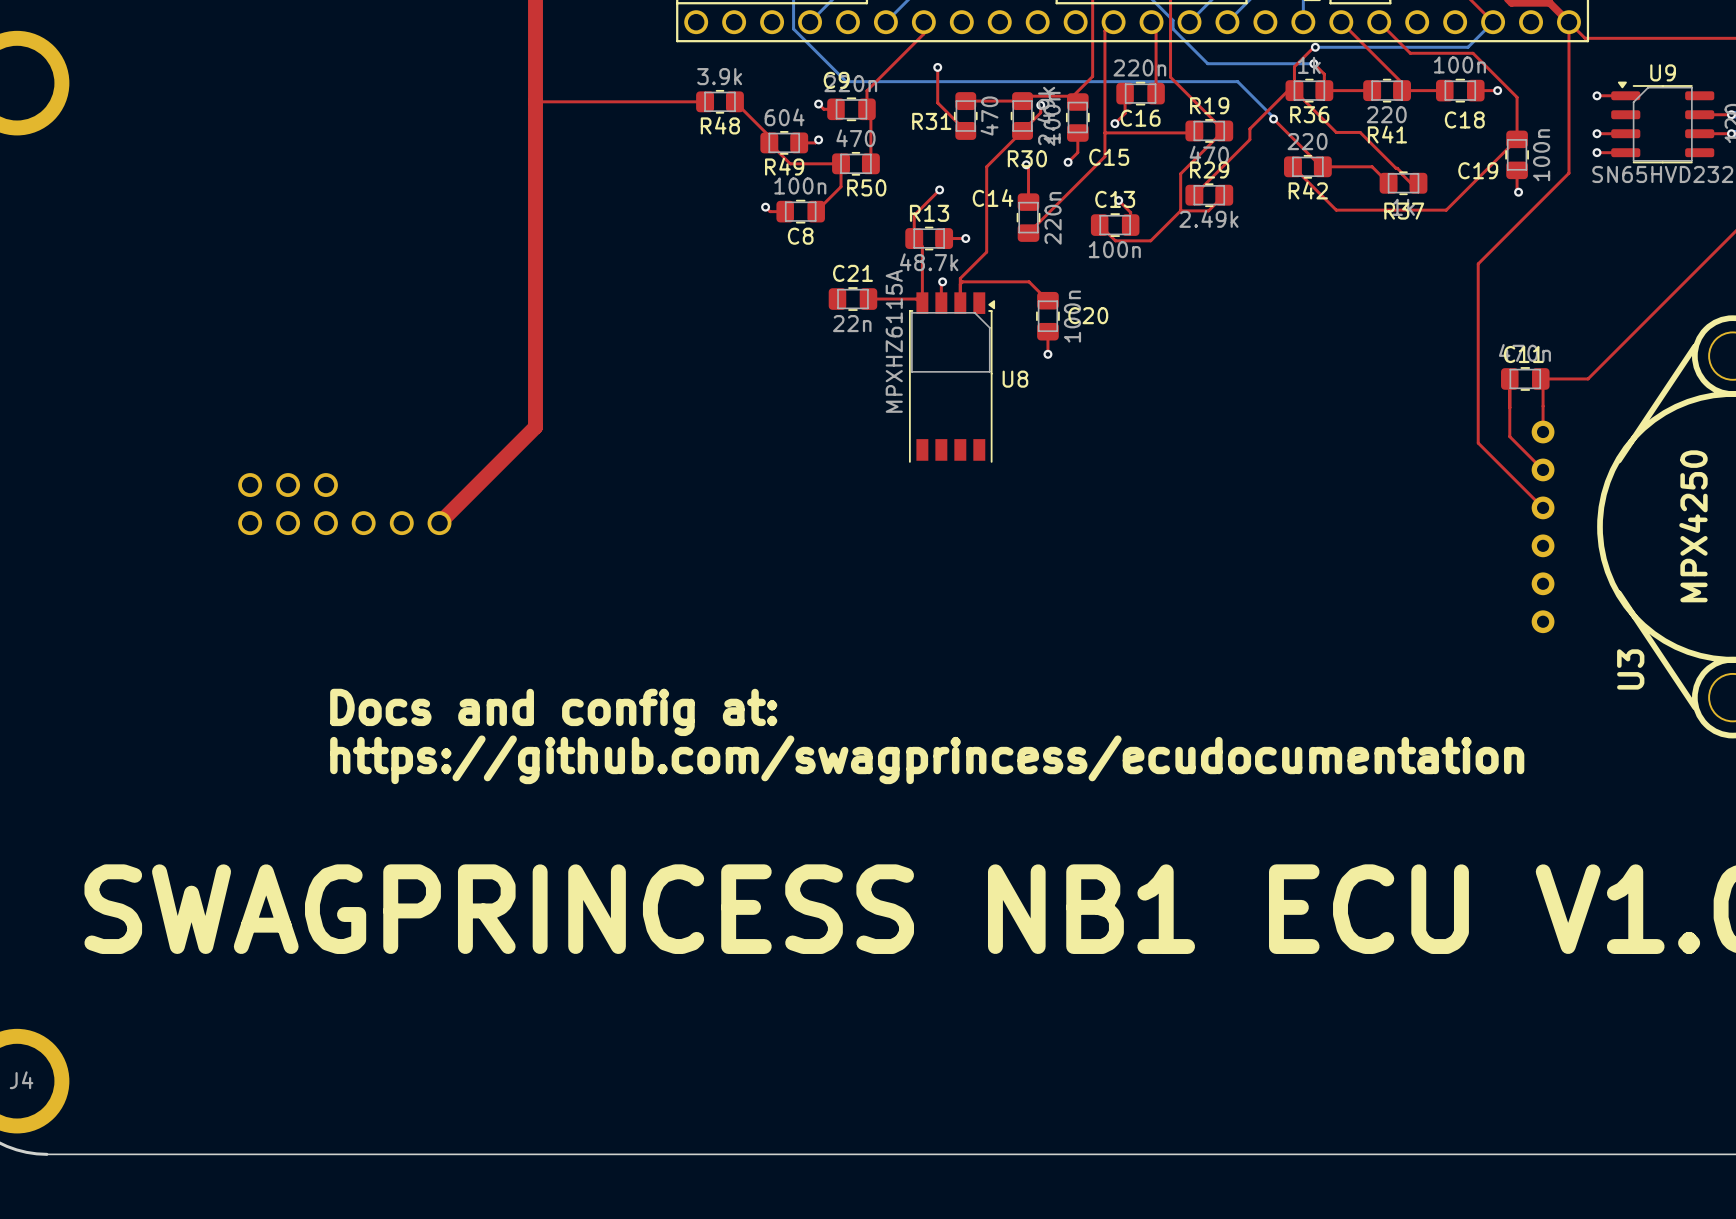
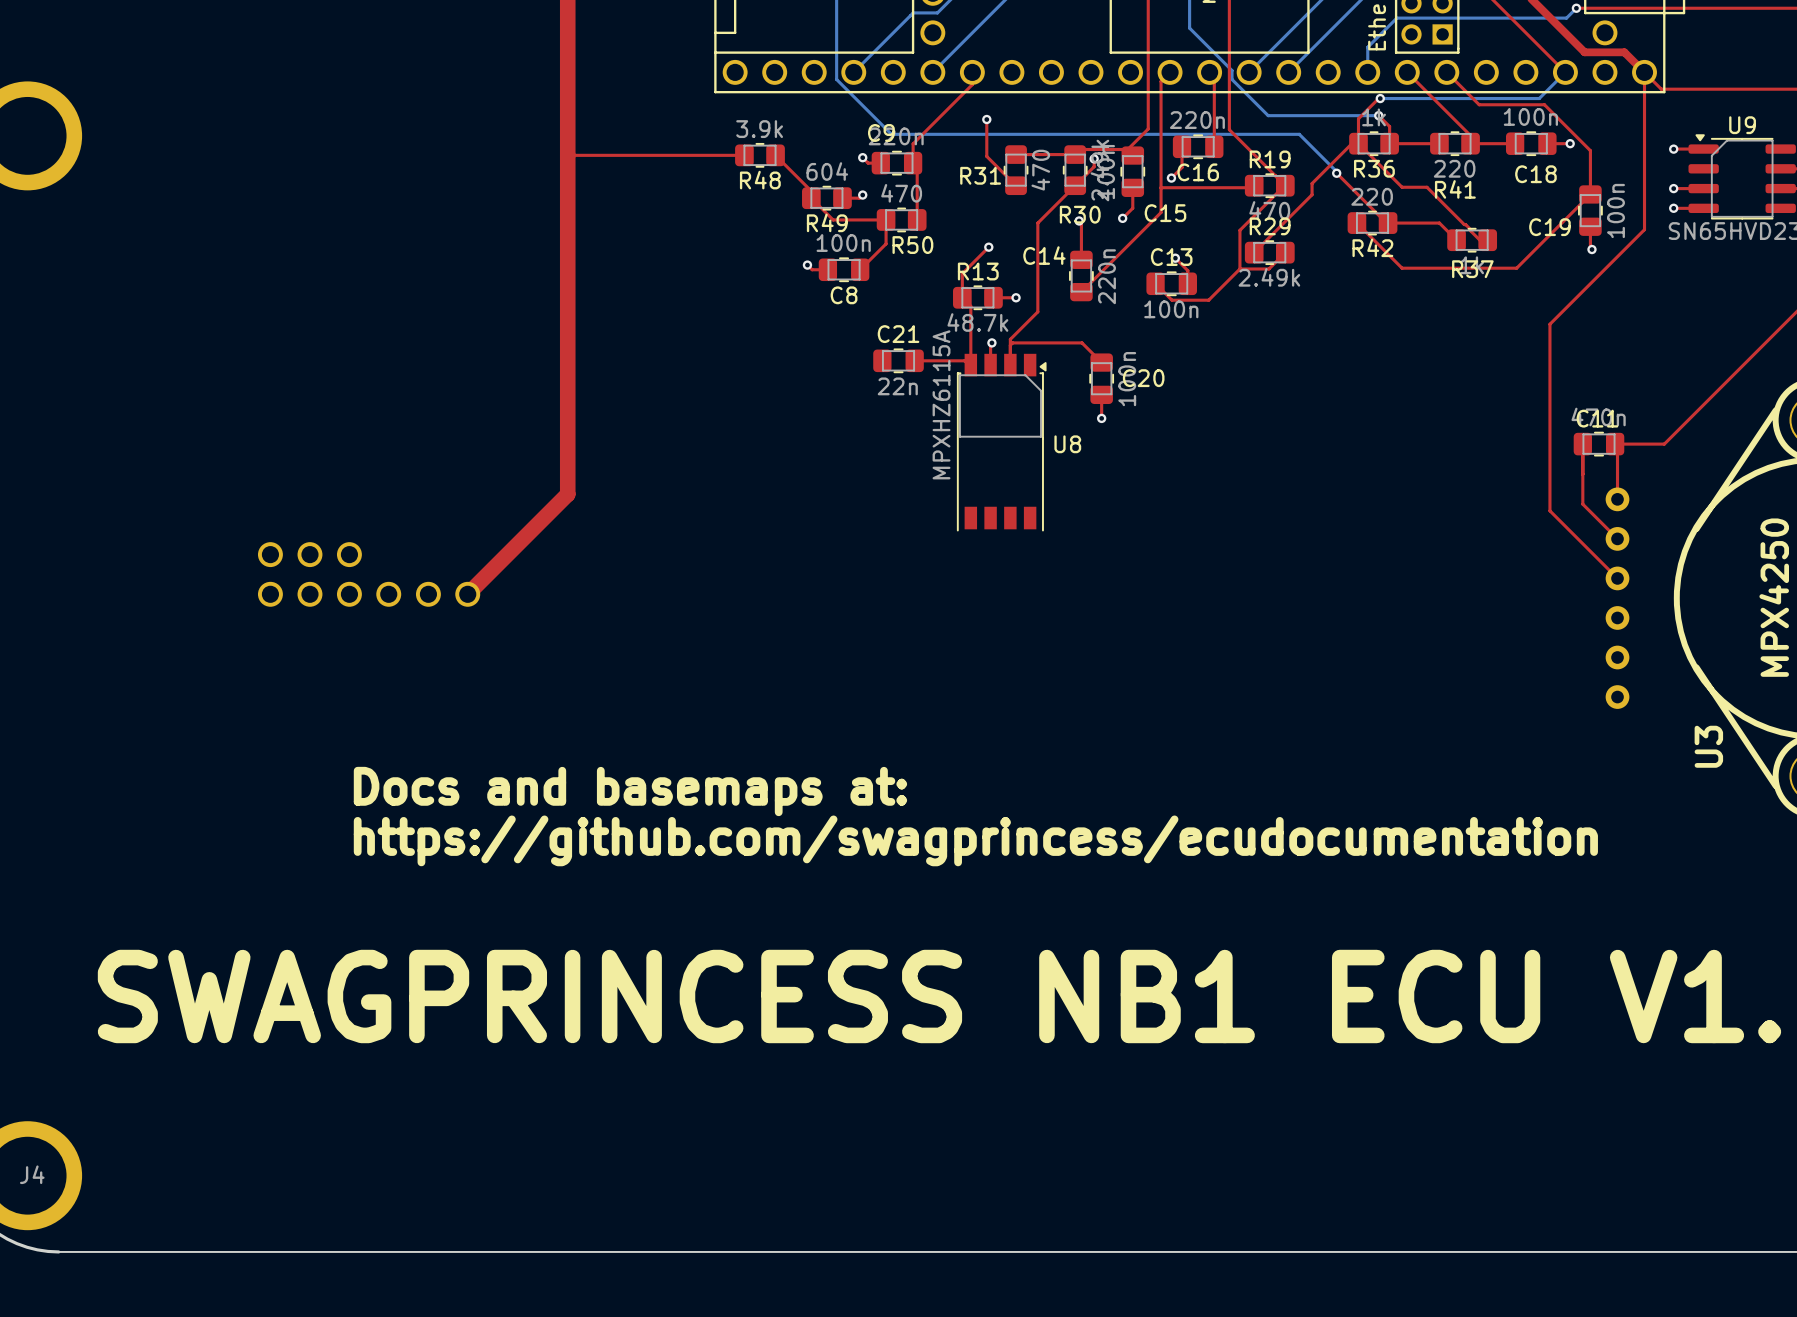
text: Docs and config at: (553, 712) -> Docs and basemaps at: (630, 791)

